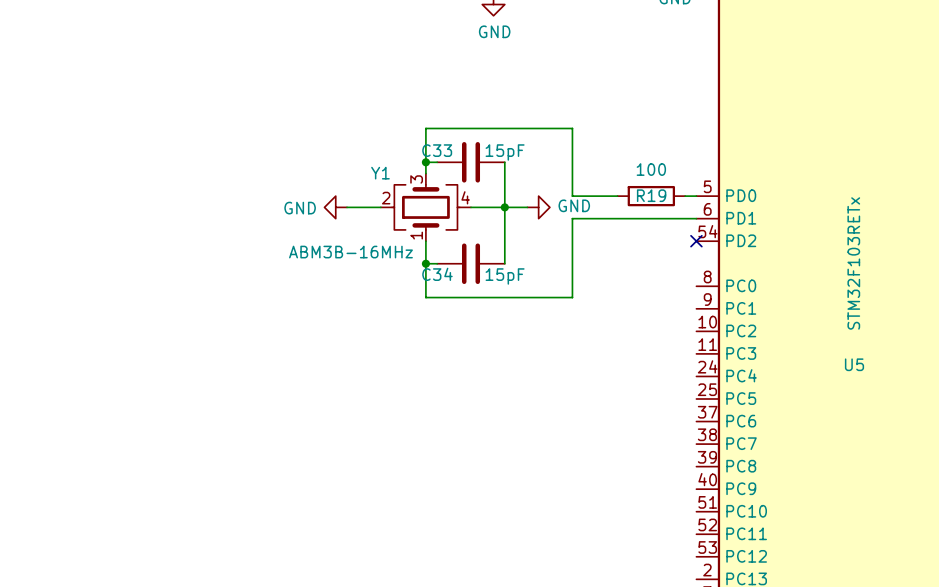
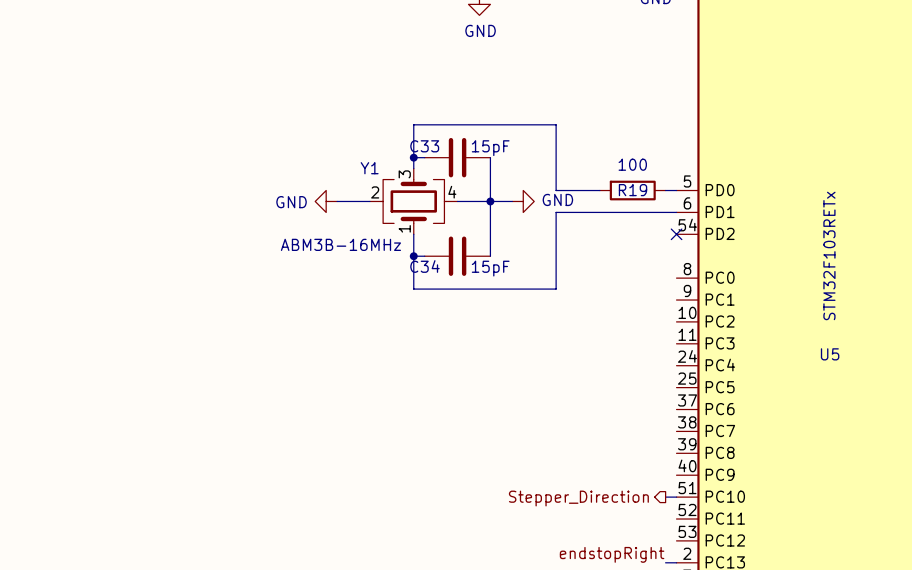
wire: none -> (665, 497) (676, 497)
hierarchical label: none -> Stepper_Direction (578, 498)
label: none -> endstopRight (612, 554)
wire: none -> (665, 562) (676, 562)

